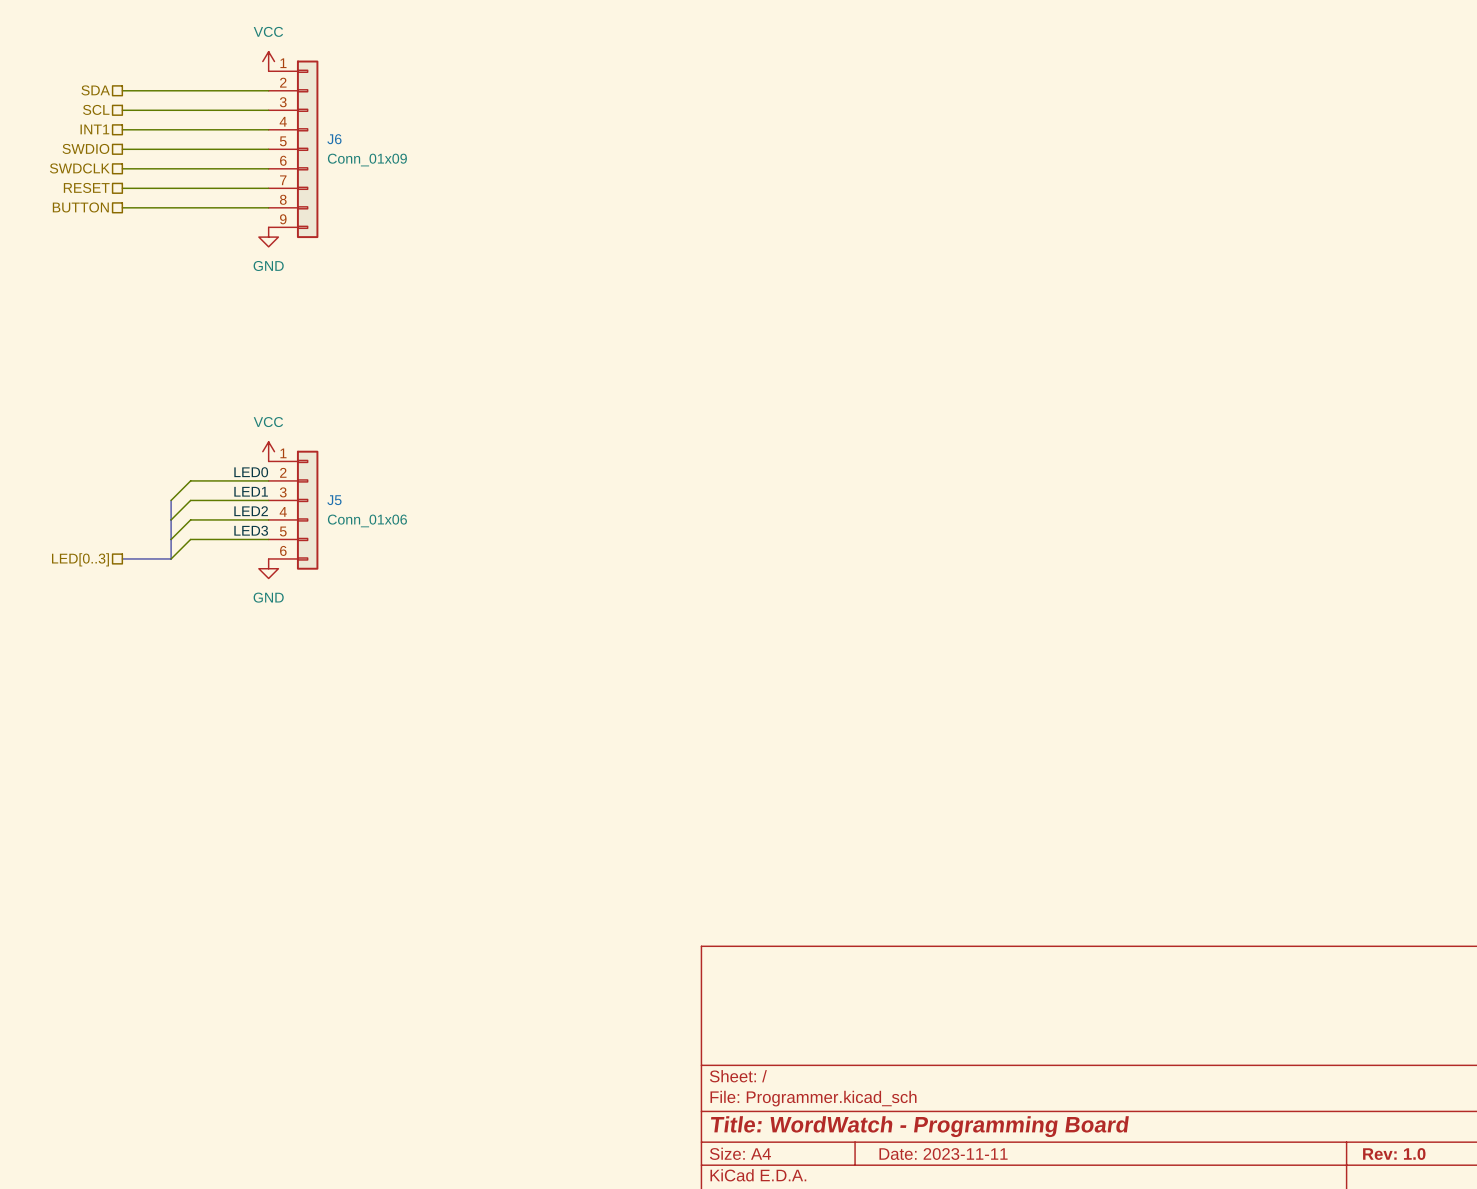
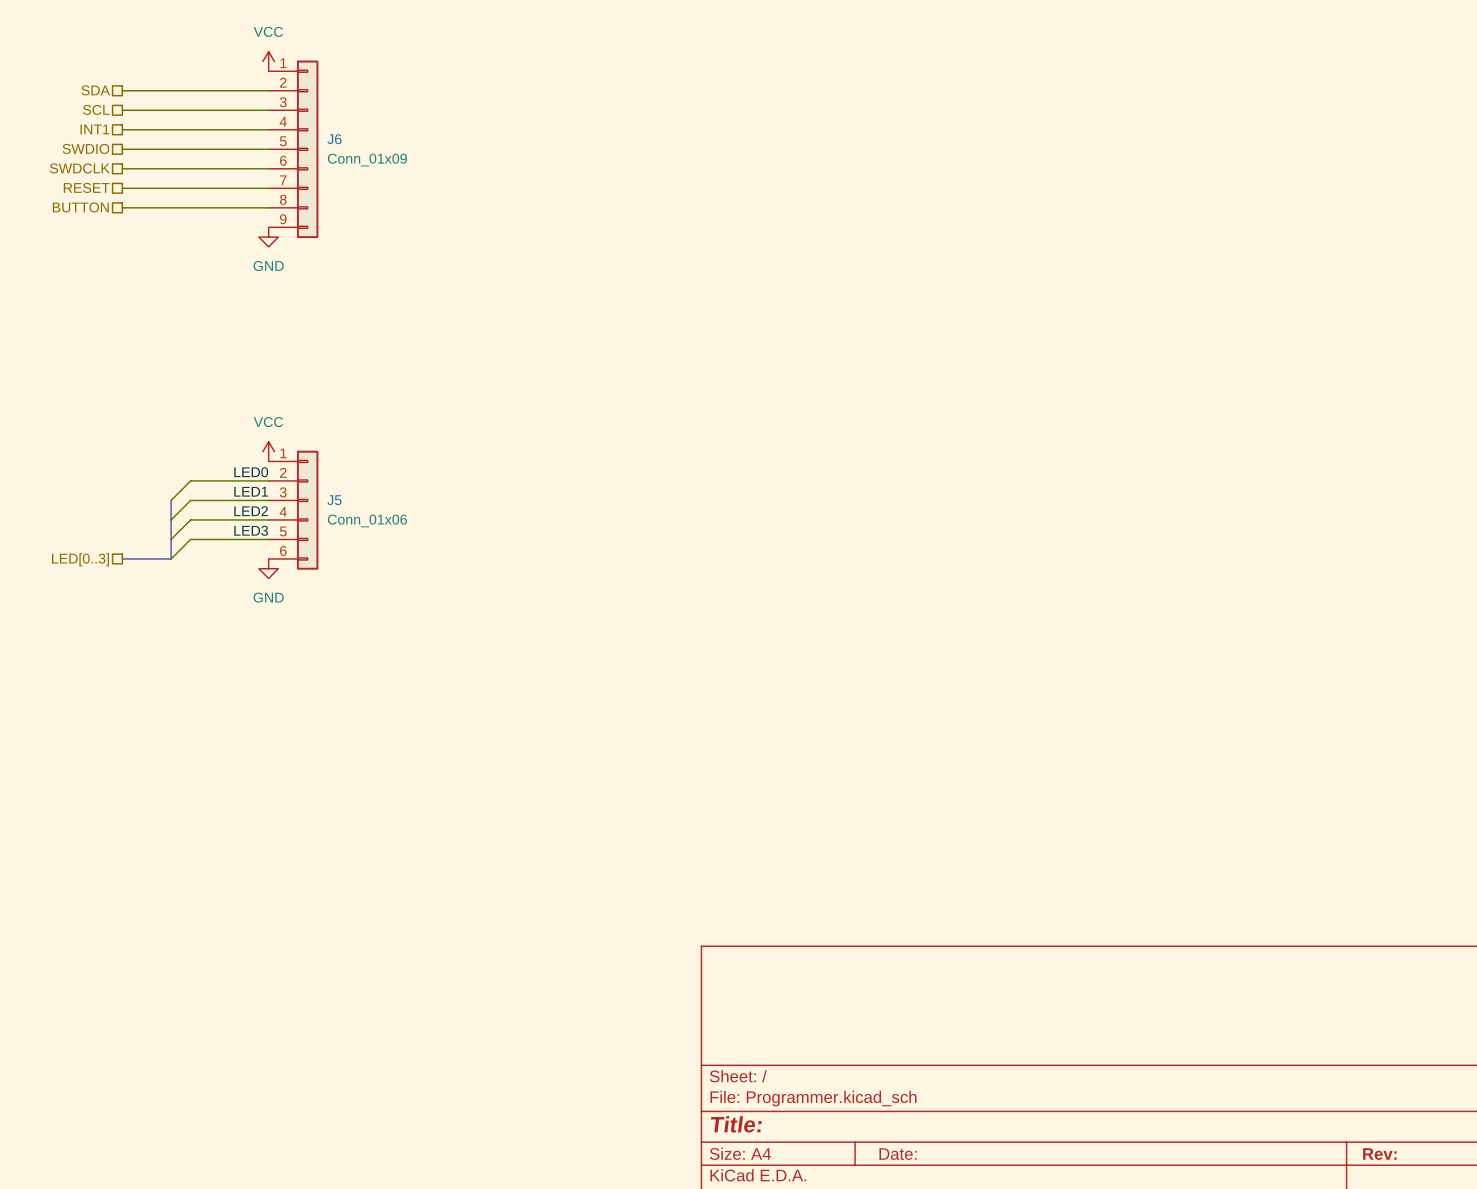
title block: Title: WordWatch - Programming Board (919, 1126) -> Title: (736, 1124)
title block: Date: 2023-11-11 (943, 1154) -> Date: (898, 1154)
title block: Rev: 1.0 (1394, 1154) -> Rev: (1379, 1154)

